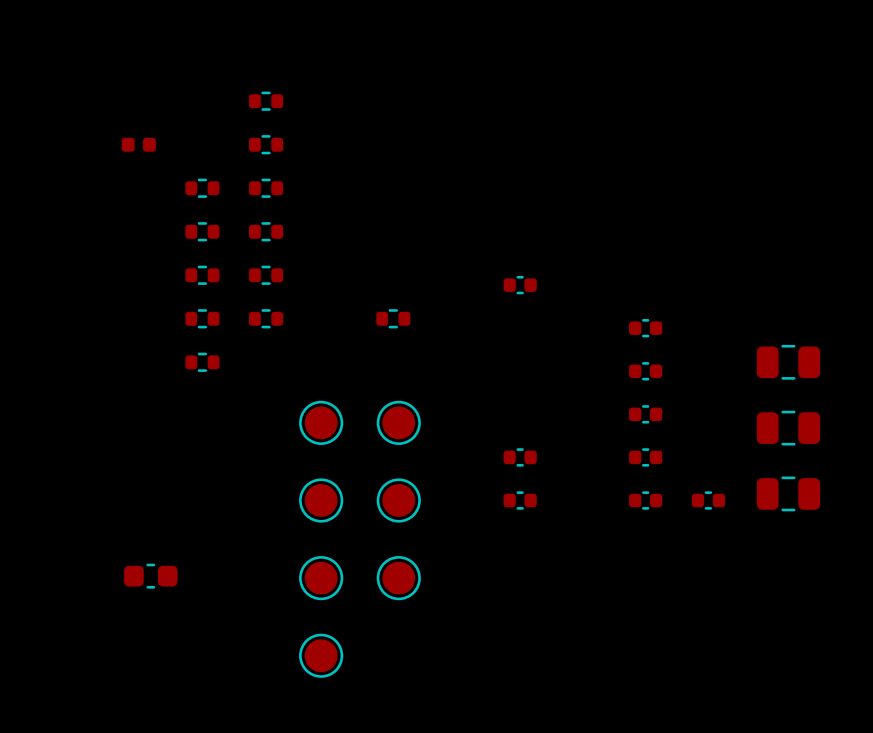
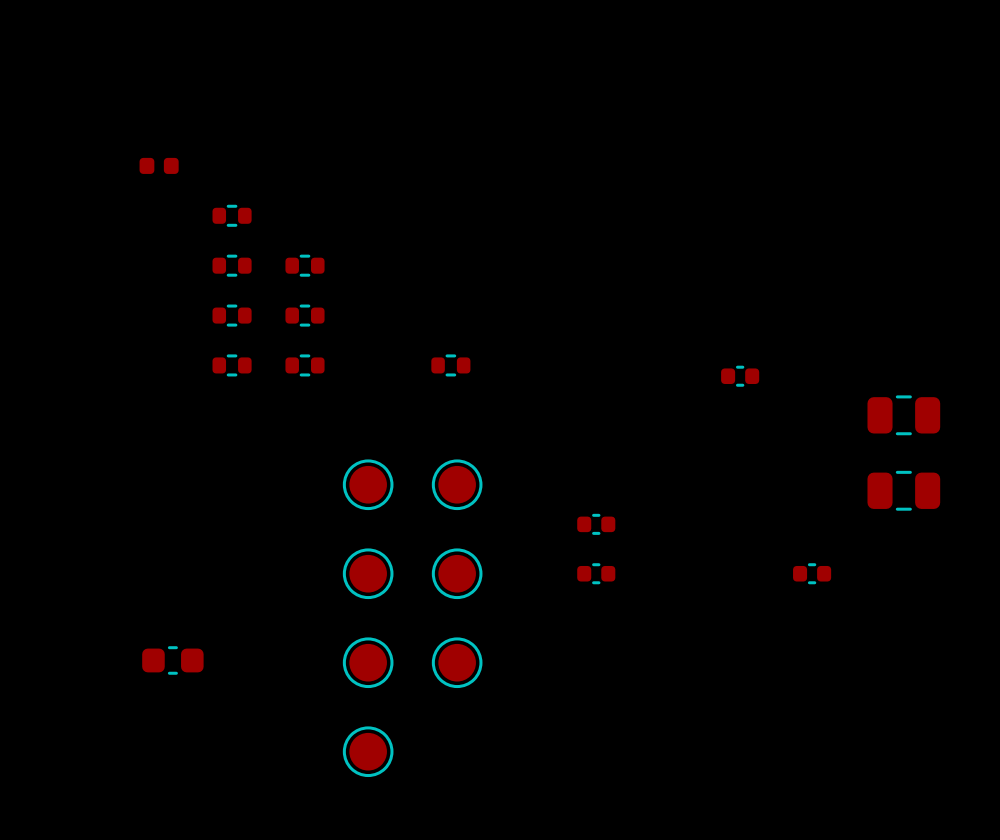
part: (266, 101) -> none
part: (266, 144) -> none
part: (266, 188) -> none
part: (520, 285) -> none
part: (202, 362) -> none
part: (645, 371) -> none
part: (645, 414) -> none
part: (645, 457) -> none
part: (788, 493) -> none
part: (645, 500) -> none

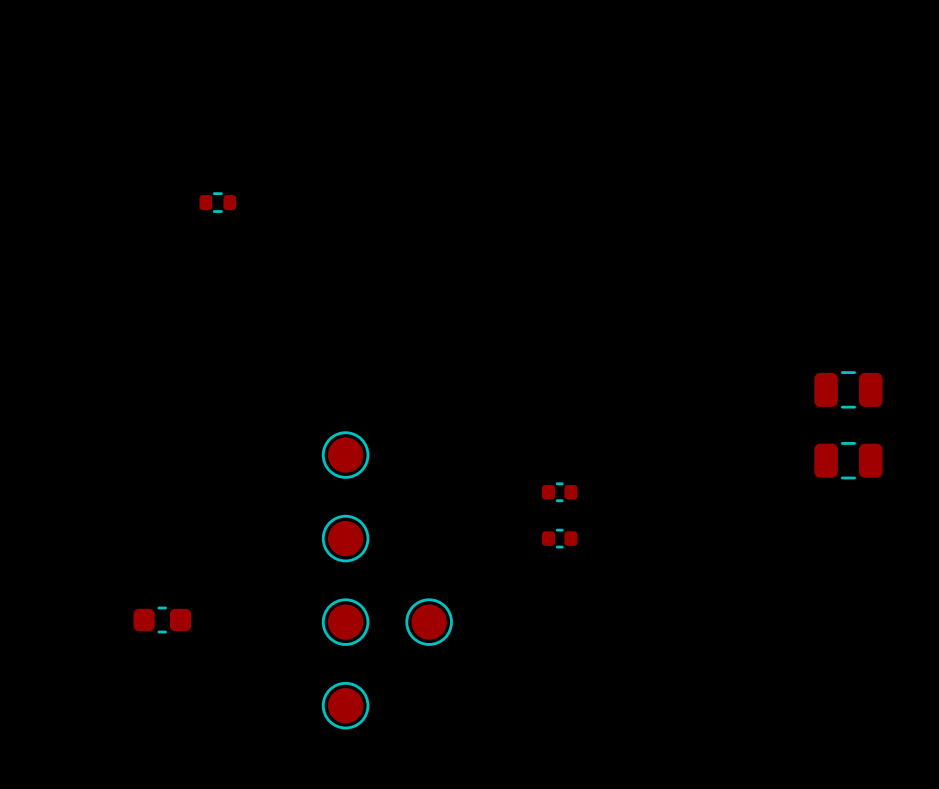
part: (159, 165) -> none
part: (232, 265) -> none
part: (304, 265) -> none
part: (232, 315) -> none
part: (304, 315) -> none
part: (232, 365) -> none
part: (304, 365) -> none
part: (450, 365) -> none
part: (740, 376) -> none
part: (457, 484) -> none
part: (457, 573) -> none
part: (812, 573) -> none

